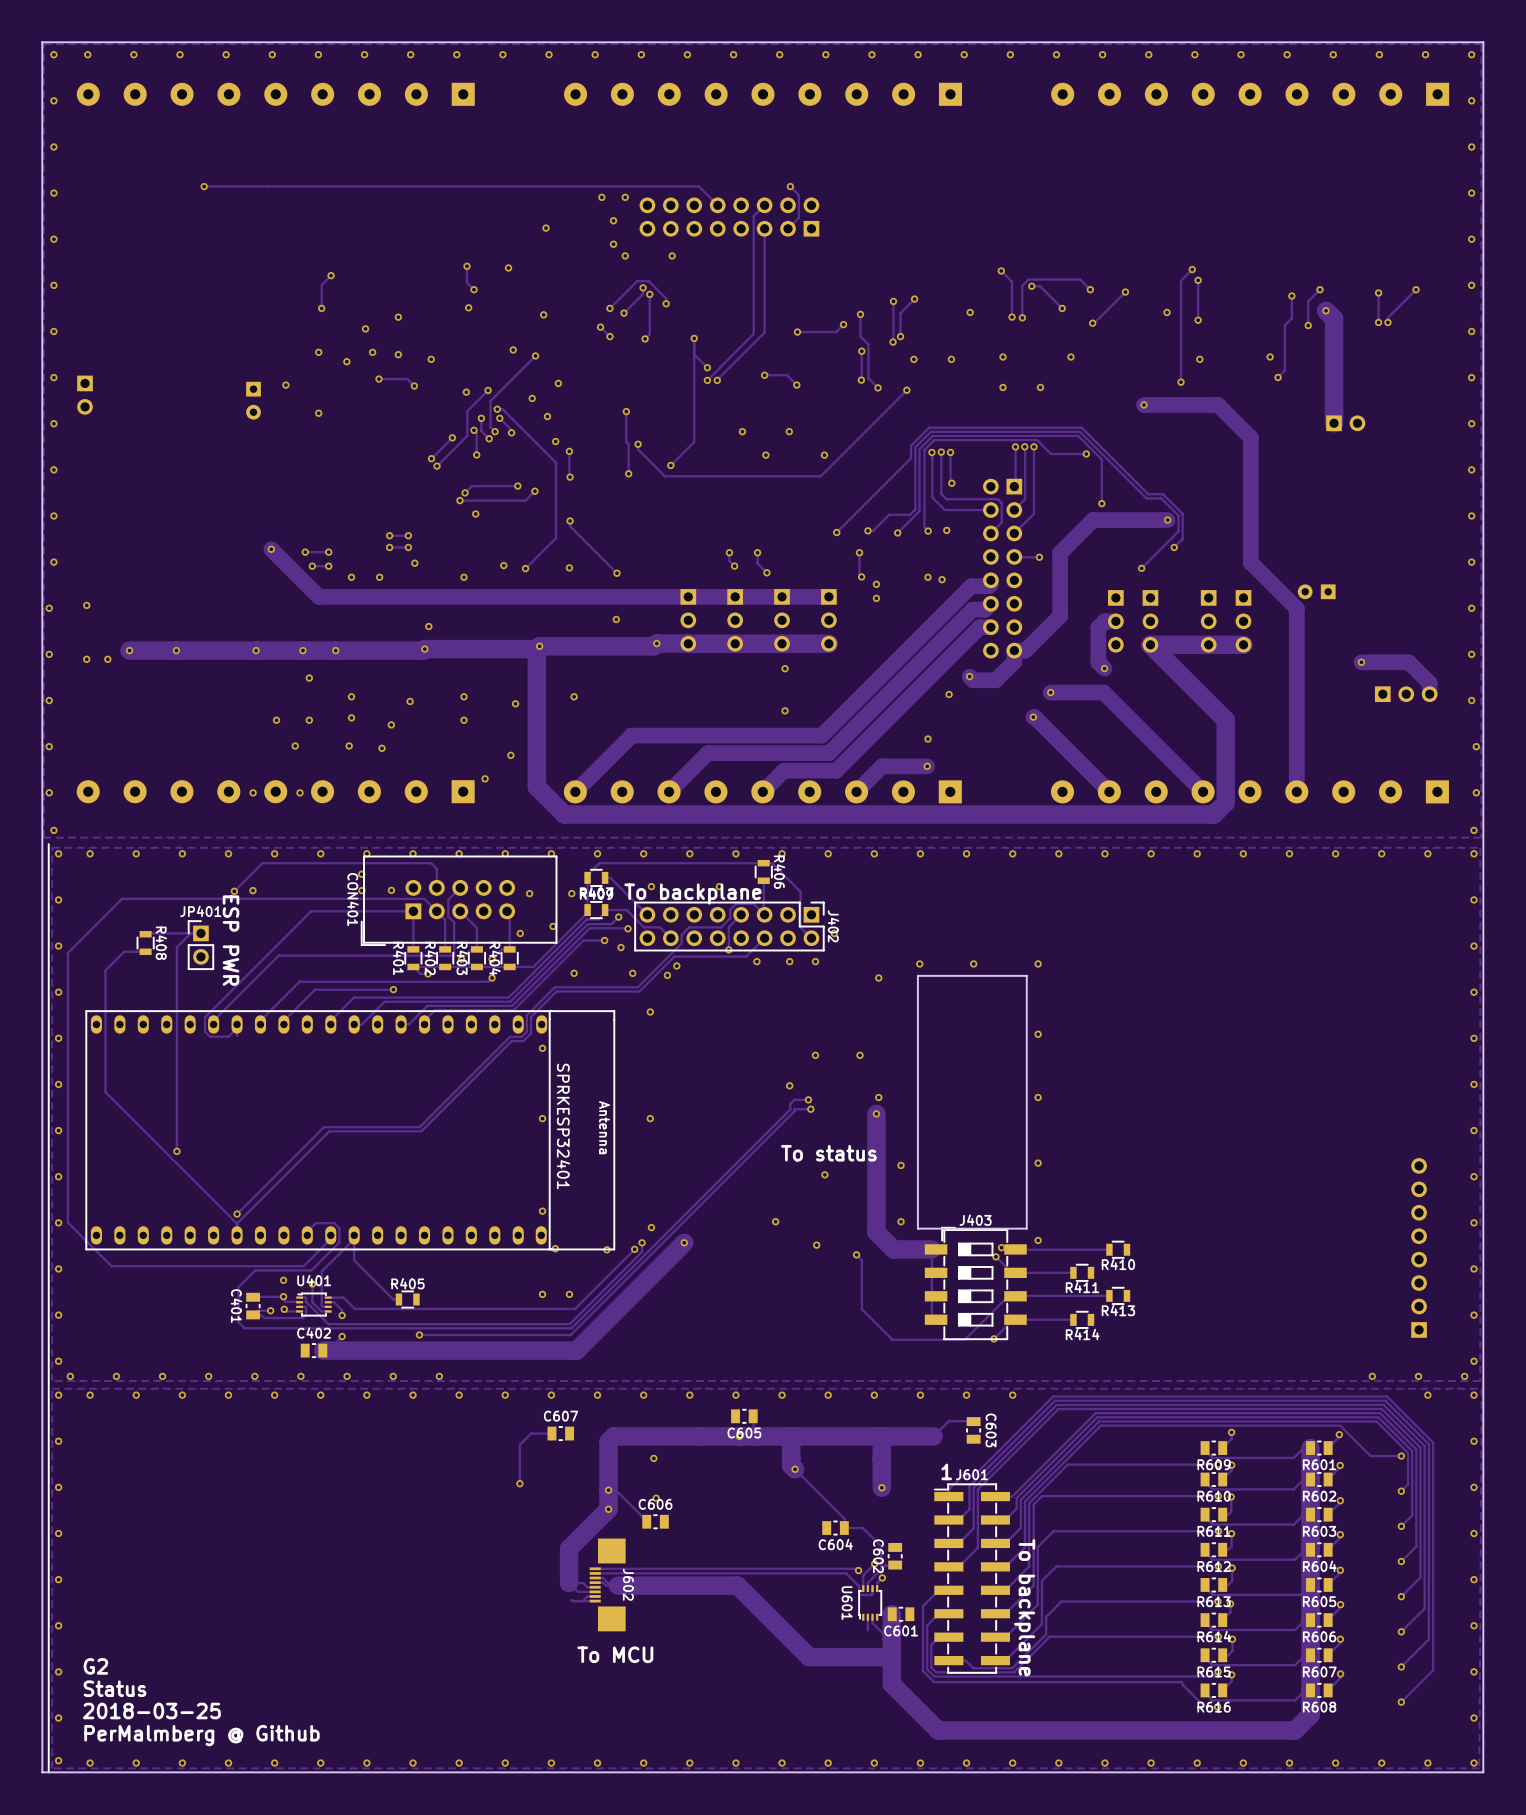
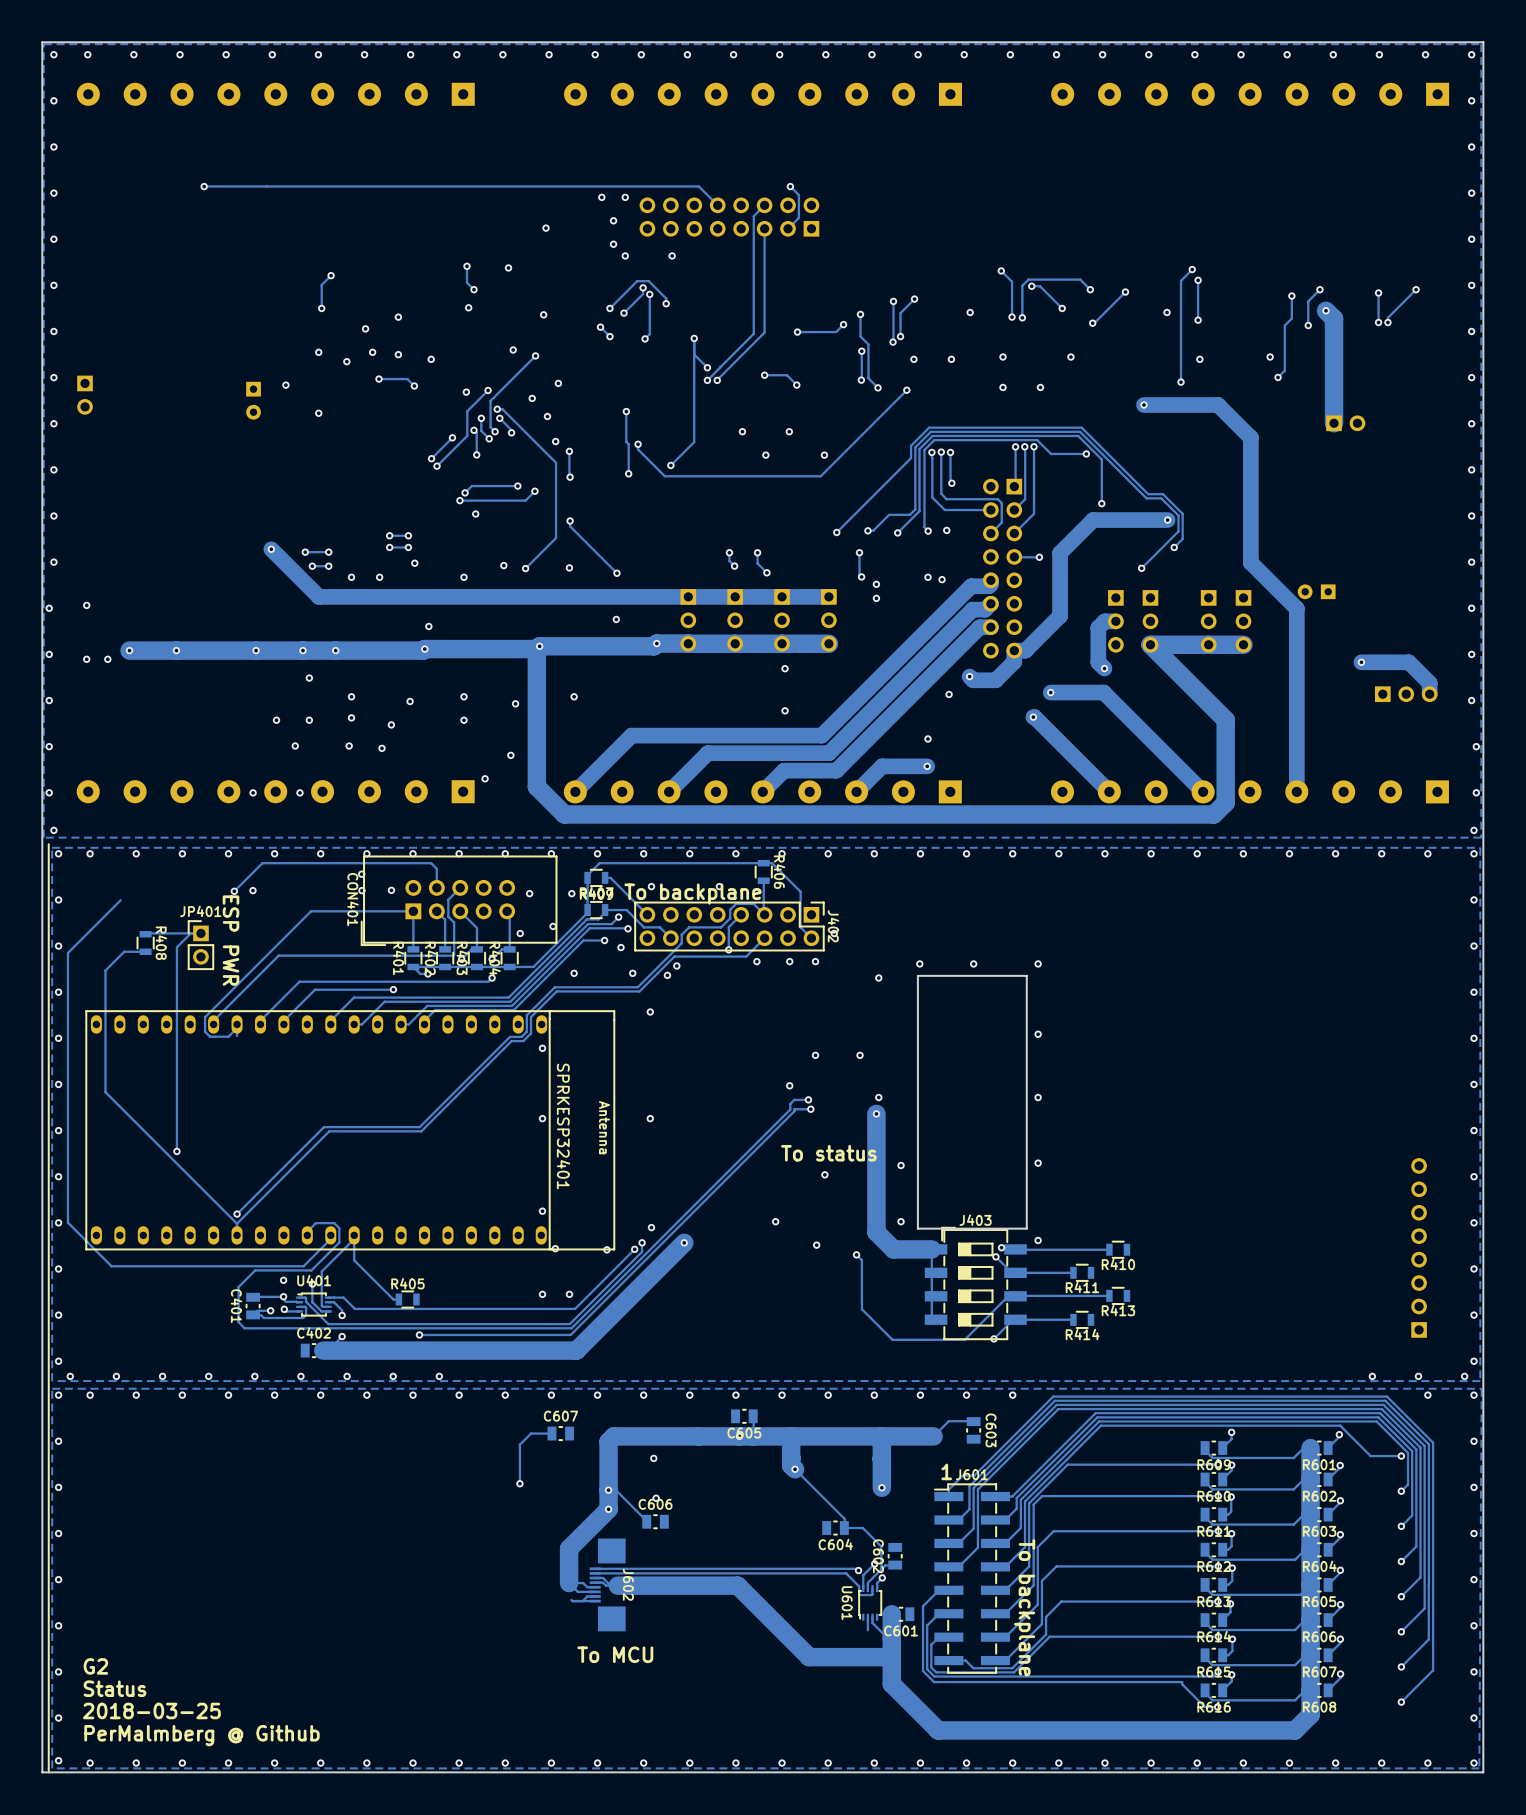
track: (120, 900) (424, 898) (436, 911) -> none

